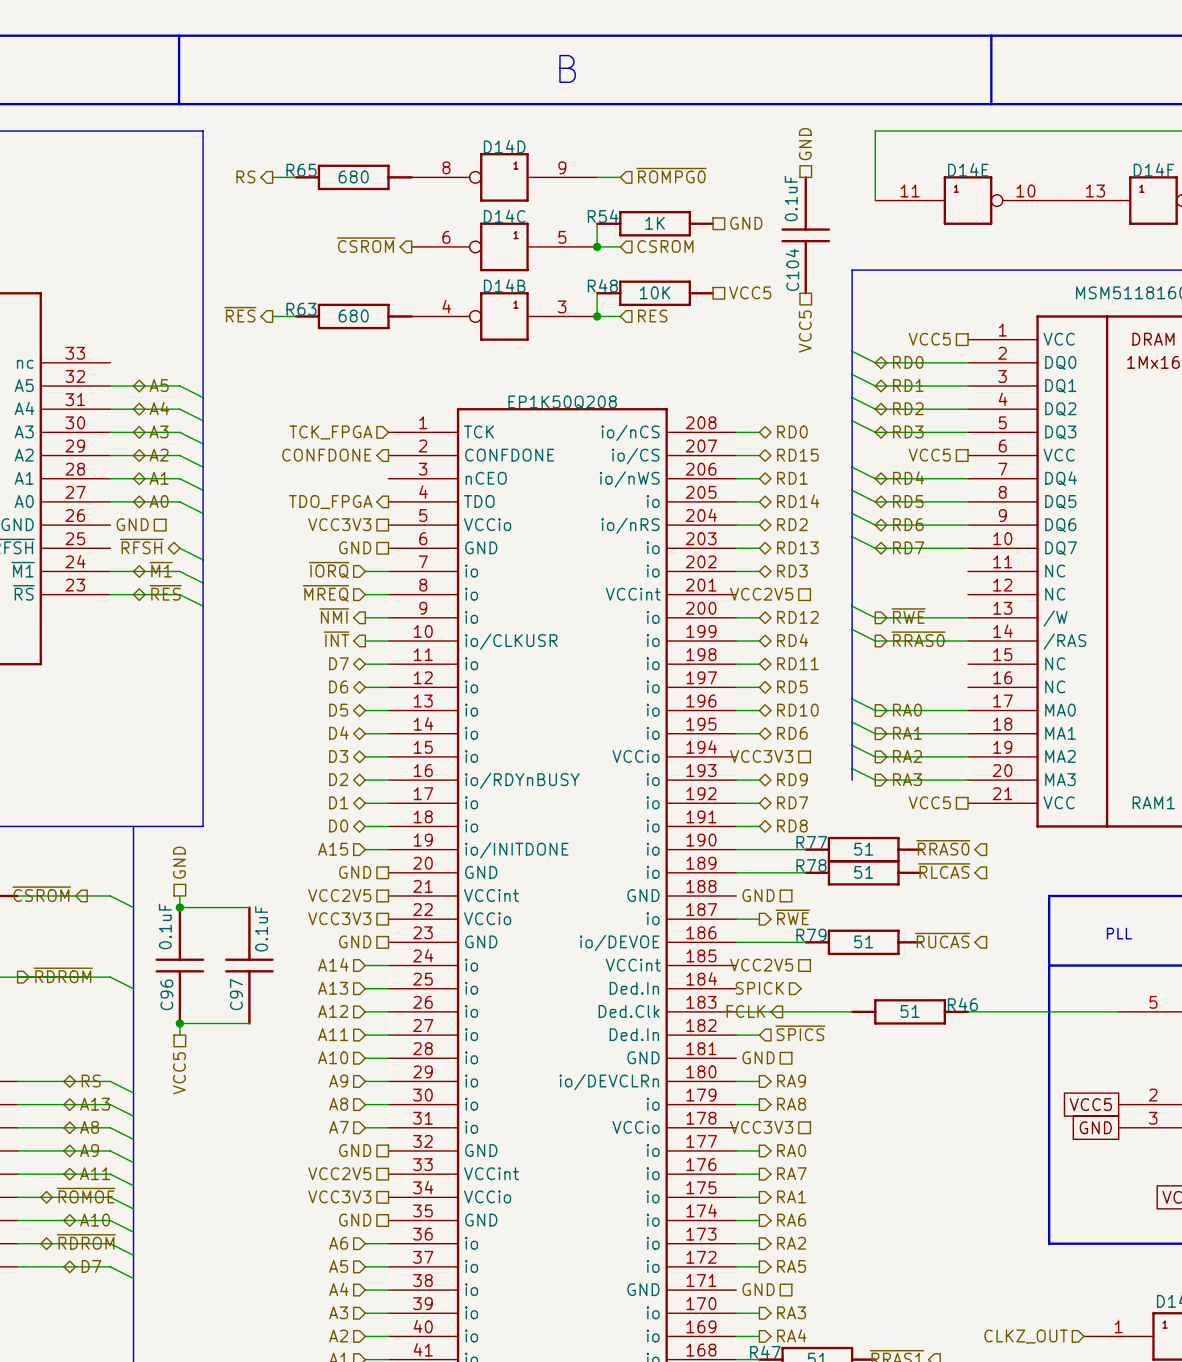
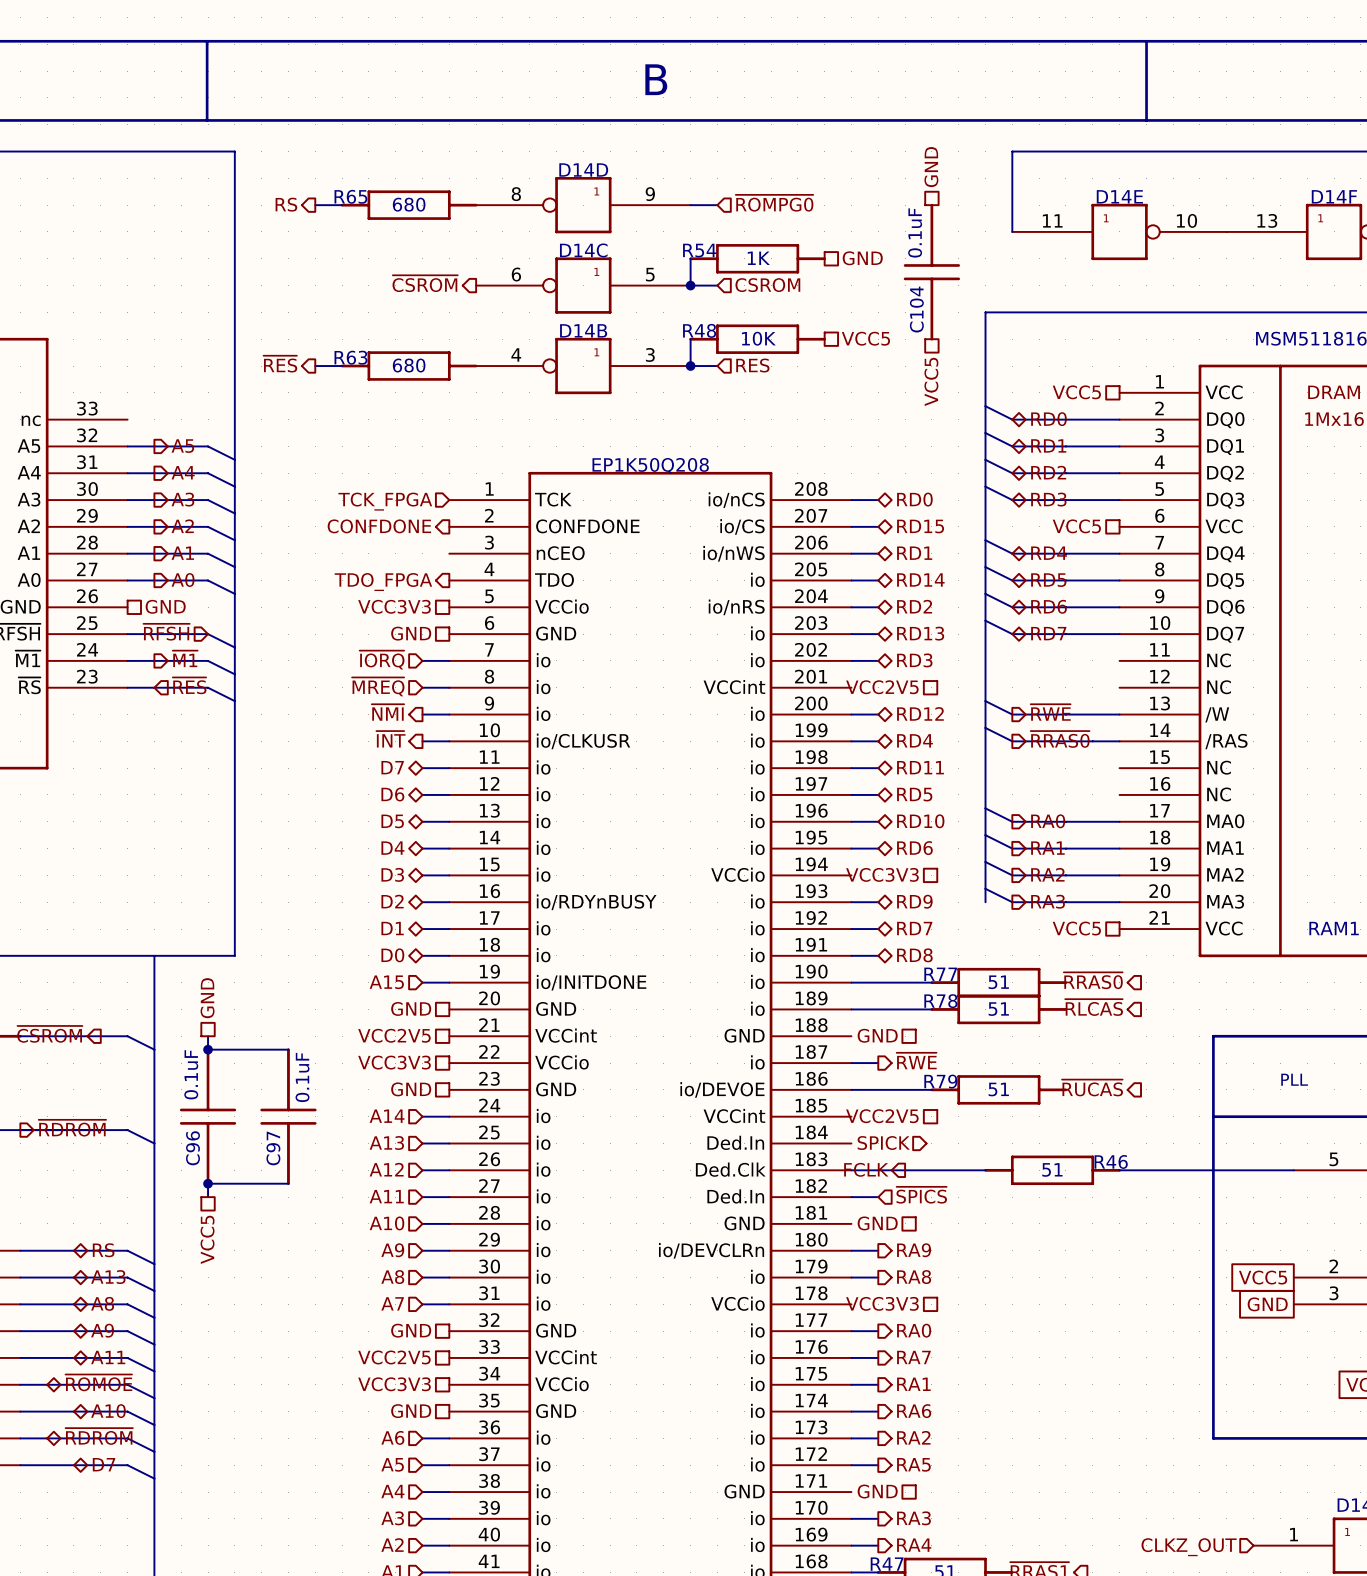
hierarchical label shape: bidirectional (159, 385) -> output (182, 446)
hierarchical label shape: bidirectional (159, 408) -> output (183, 472)
hierarchical label shape: bidirectional (159, 431) -> output (182, 499)
hierarchical label shape: bidirectional (159, 455) -> output (182, 526)
hierarchical label shape: bidirectional (159, 478) -> output (182, 553)
hierarchical label shape: bidirectional (159, 501) -> output (183, 580)
hierarchical label rotation: 0° (132, 524) -> 180° (165, 606)
hierarchical label shape: bidirectional (141, 546) -> input (166, 632)
wire: none -> (127, 634) (208, 634)
hierarchical label shape: bidirectional (161, 569) -> output (185, 658)
hierarchical label shape: bidirectional (165, 592) -> input (189, 685)

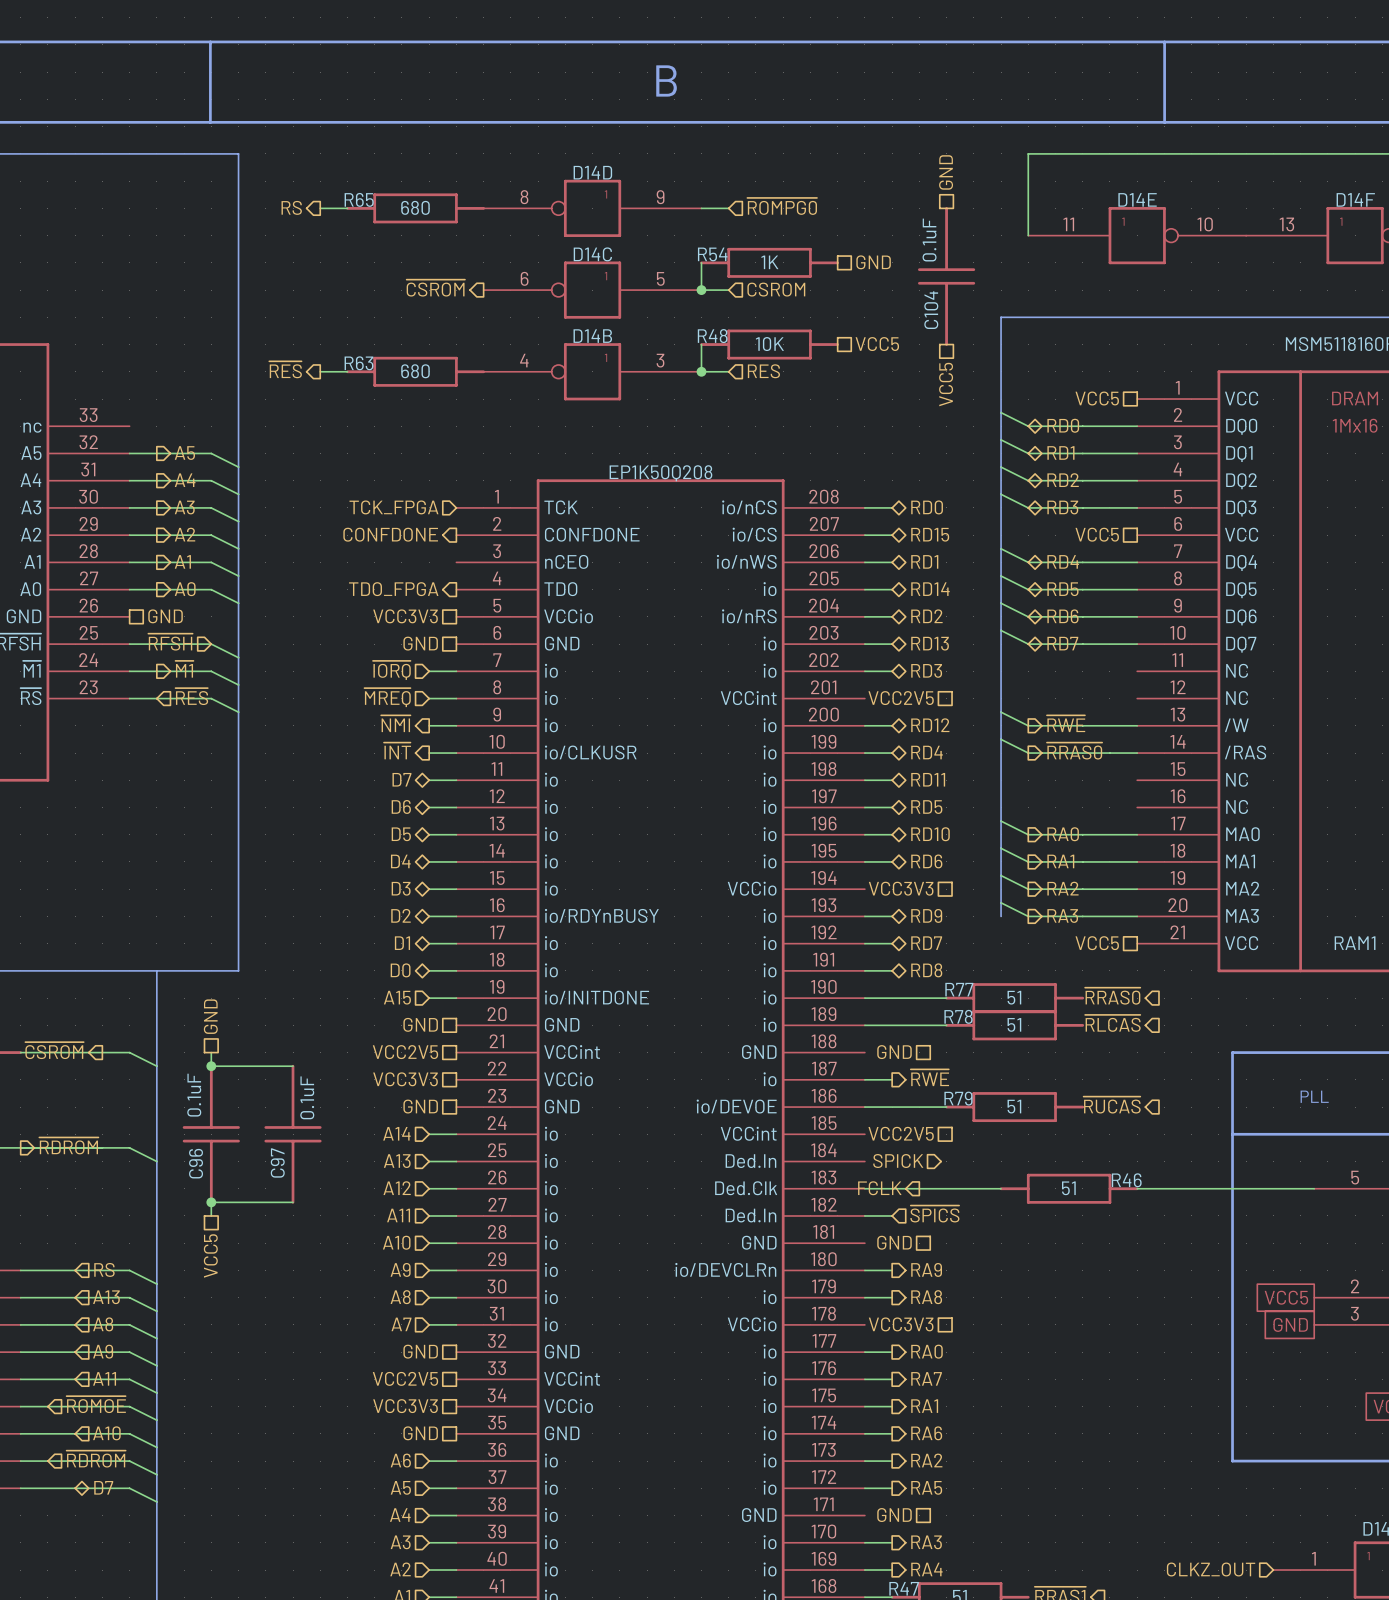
hierarchical label shape: bidirectional (103, 1250) -> input (104, 1269)
hierarchical label shape: bidirectional (108, 1277) -> input (106, 1297)
hierarchical label shape: bidirectional (102, 1303) -> input (103, 1324)
hierarchical label shape: bidirectional (102, 1330) -> input (103, 1351)
hierarchical label shape: bidirectional (108, 1357) -> input (104, 1378)
hierarchical label shape: bidirectional (98, 1382) -> input (96, 1404)
hierarchical label shape: bidirectional (108, 1411) -> input (106, 1433)
hierarchical label shape: bidirectional (99, 1436) -> input (96, 1459)

